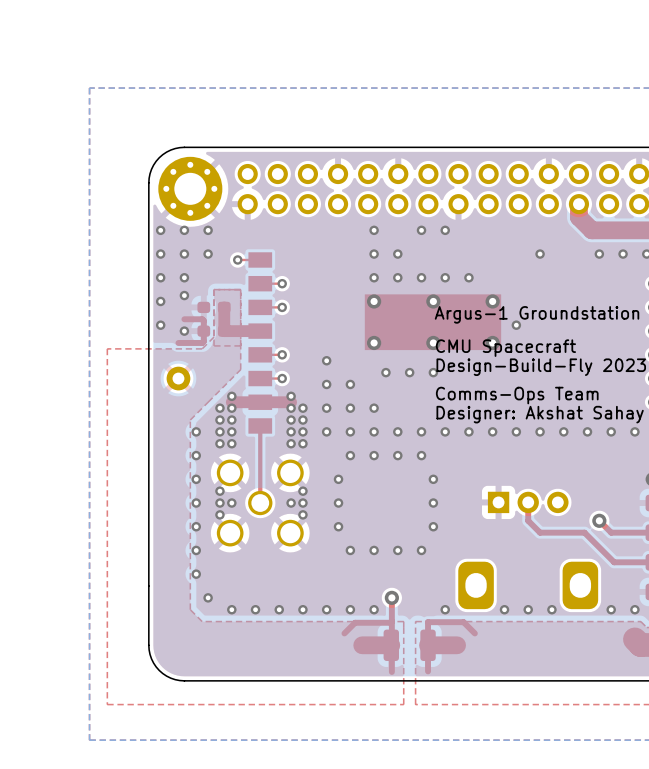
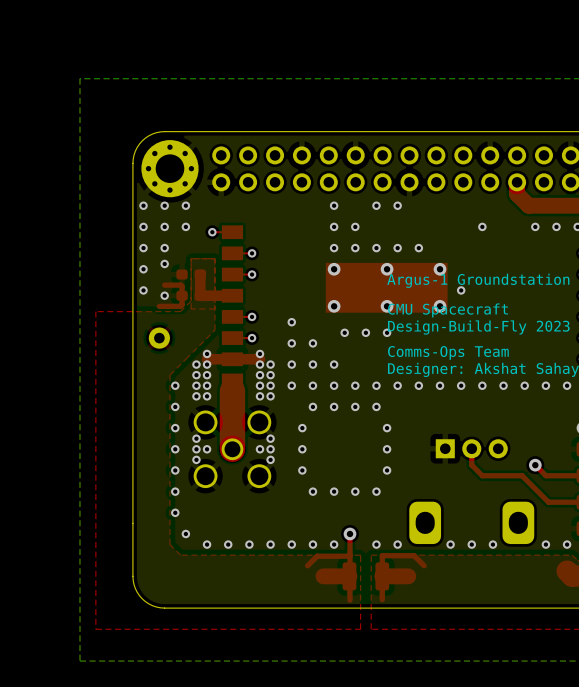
top track width: thin (260, 425) (260, 503) -> thick (232, 380) (232, 449)
via: none -> (376, 544)

